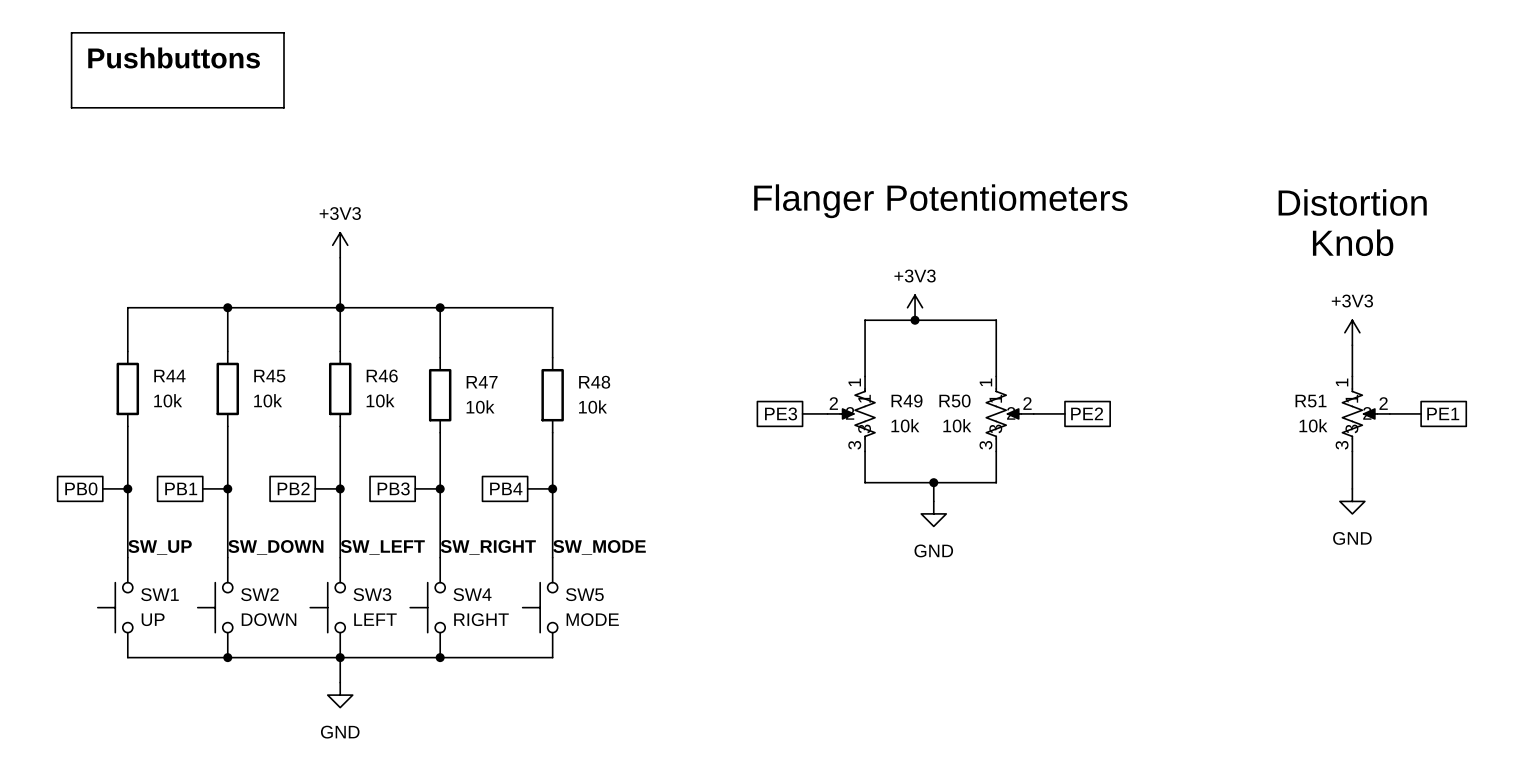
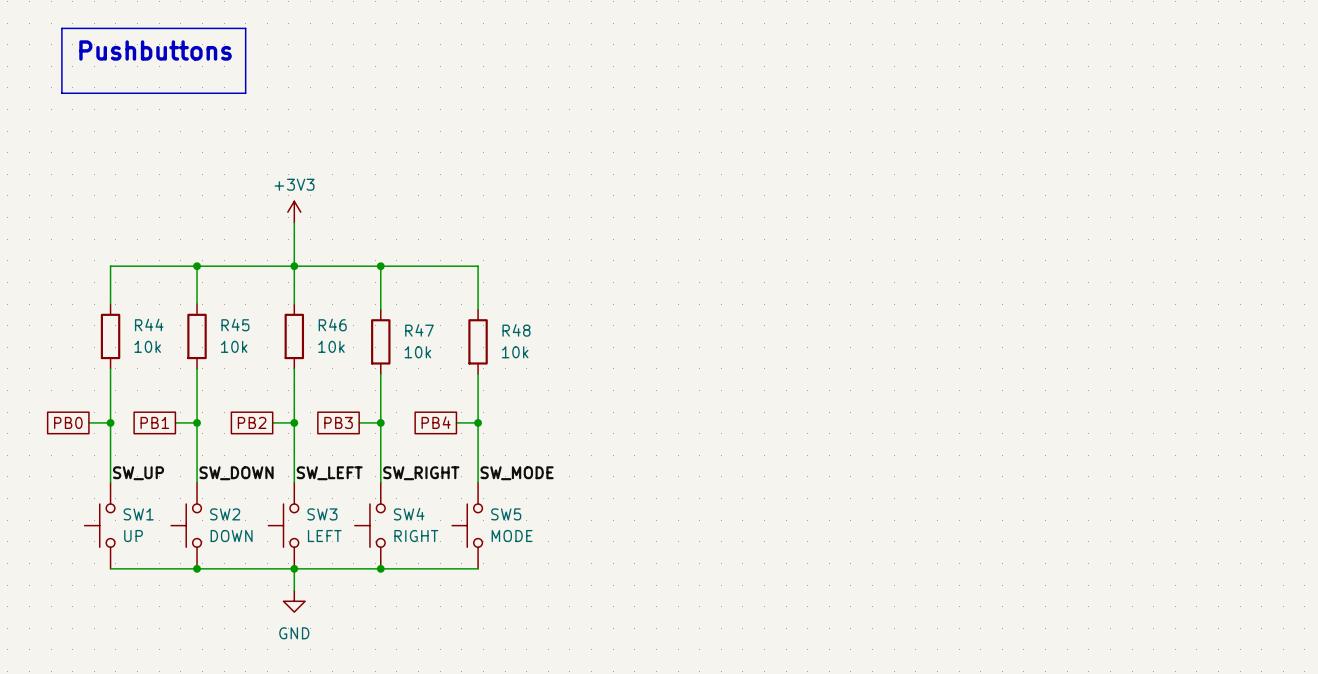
text: Flanger Potentiometers (940, 201) -> none
text: Distortion (1352, 202) -> none
text: Knob (1353, 242) -> none
power symbol: +3V3 (915, 307) -> none
junction: (915, 320) -> none
power symbol: +3V3 (1352, 332) -> none
wire: (1352, 345) (1352, 376) -> none
wire: (865, 376) (865, 320) (996, 320) (996, 376) -> none
global label: PE3 (781, 413) -> none
wire: (802, 413) (827, 413) -> none
R49: 10k (851, 413) -> none
R50: 10k (1009, 413) -> none
wire: (1033, 413) (1064, 413) -> none
global label: PE2 (1087, 413) -> none
R51: 10k (1366, 413) -> none
wire: (1389, 413) (1421, 413) -> none
global label: PE1 (1443, 413) -> none
wire: (865, 451) (865, 482) (996, 482) (996, 451) -> none
wire: (1352, 451) (1352, 488) -> none
wire: (933, 482) (933, 501) -> none
junction: (933, 482) -> none
power symbol: GND (1352, 501) -> none
power symbol: GND (933, 513) -> none

